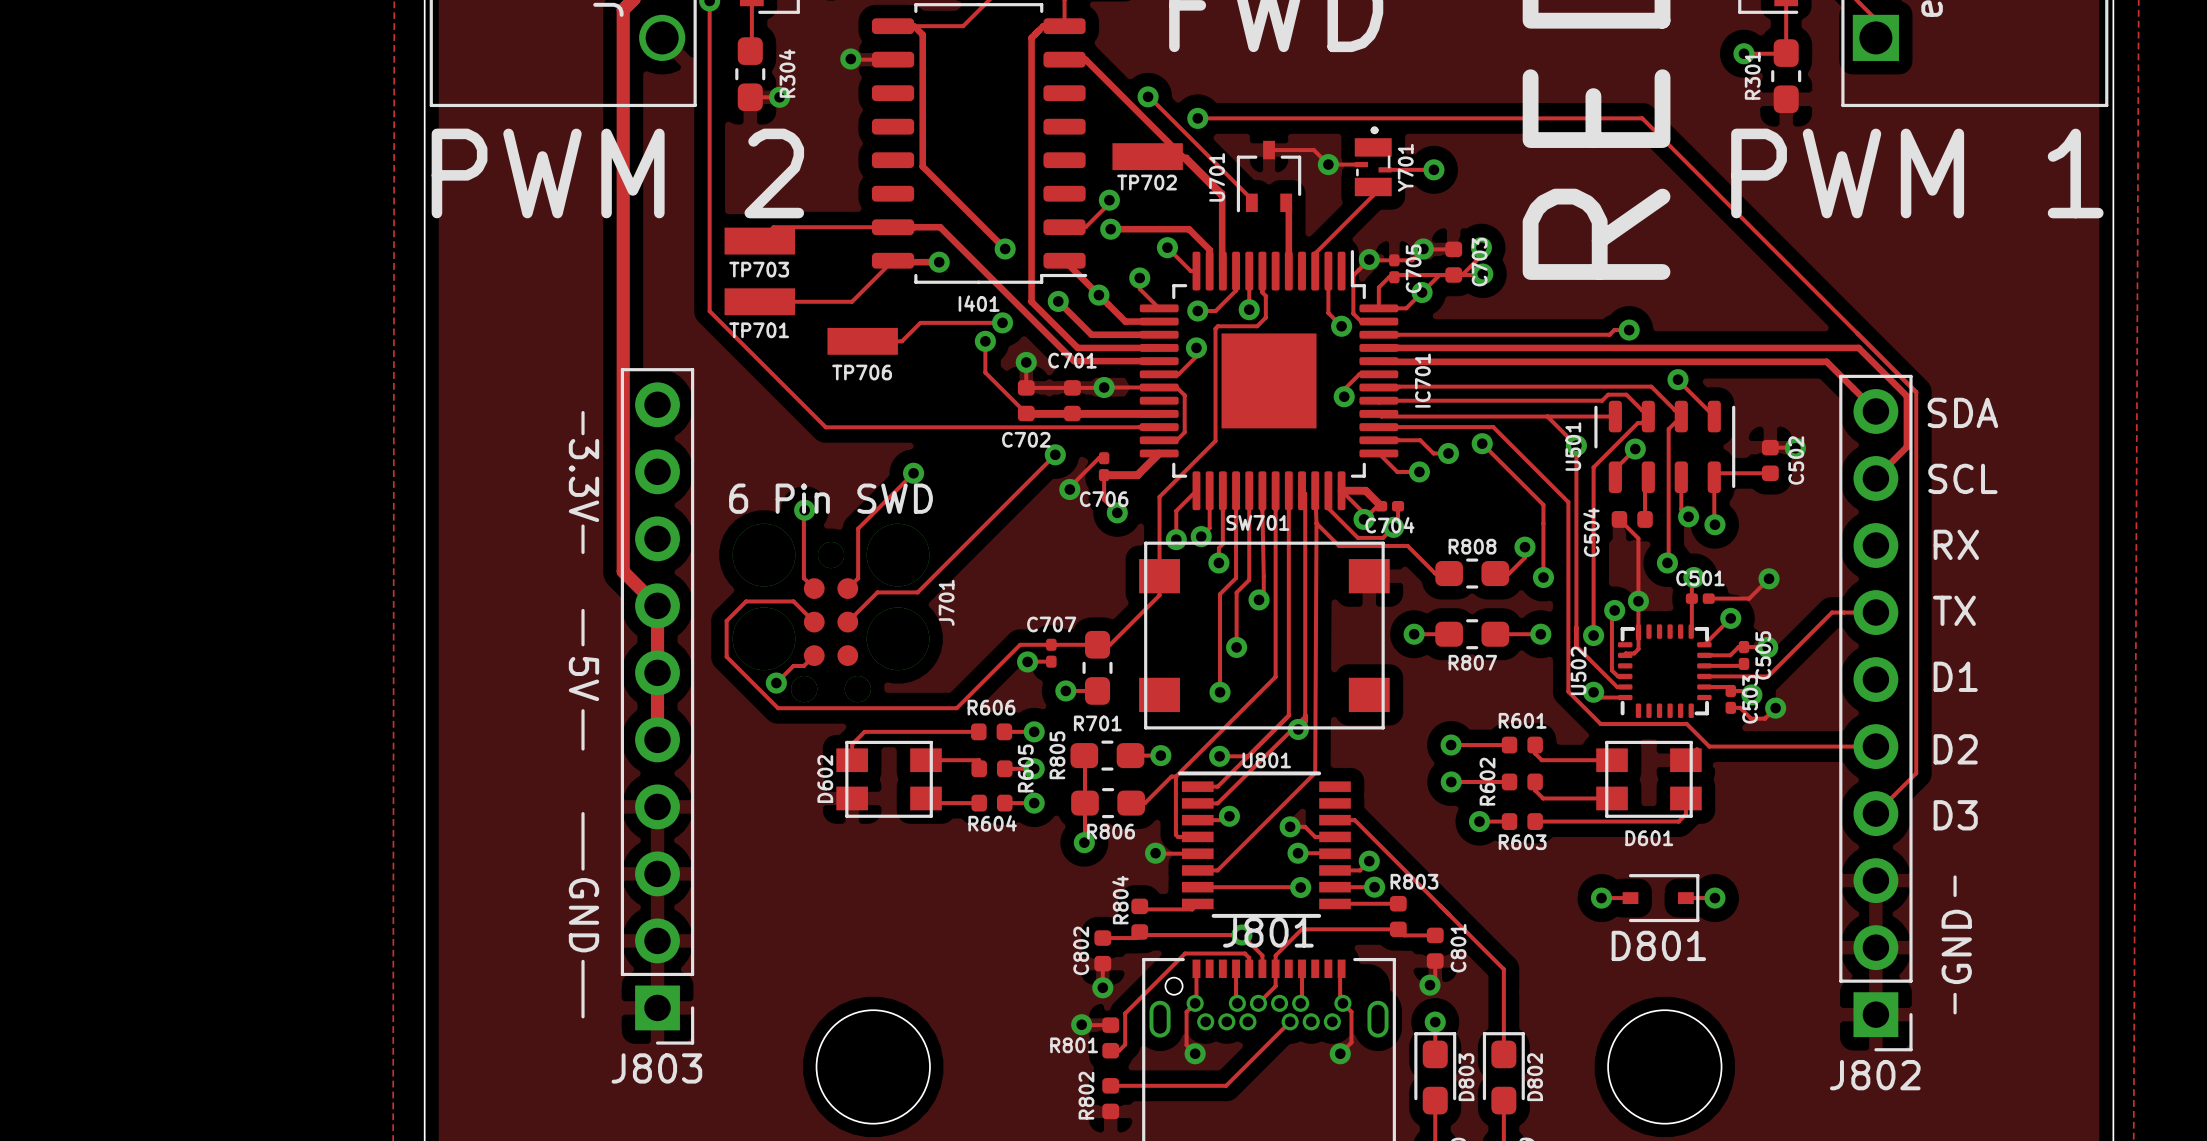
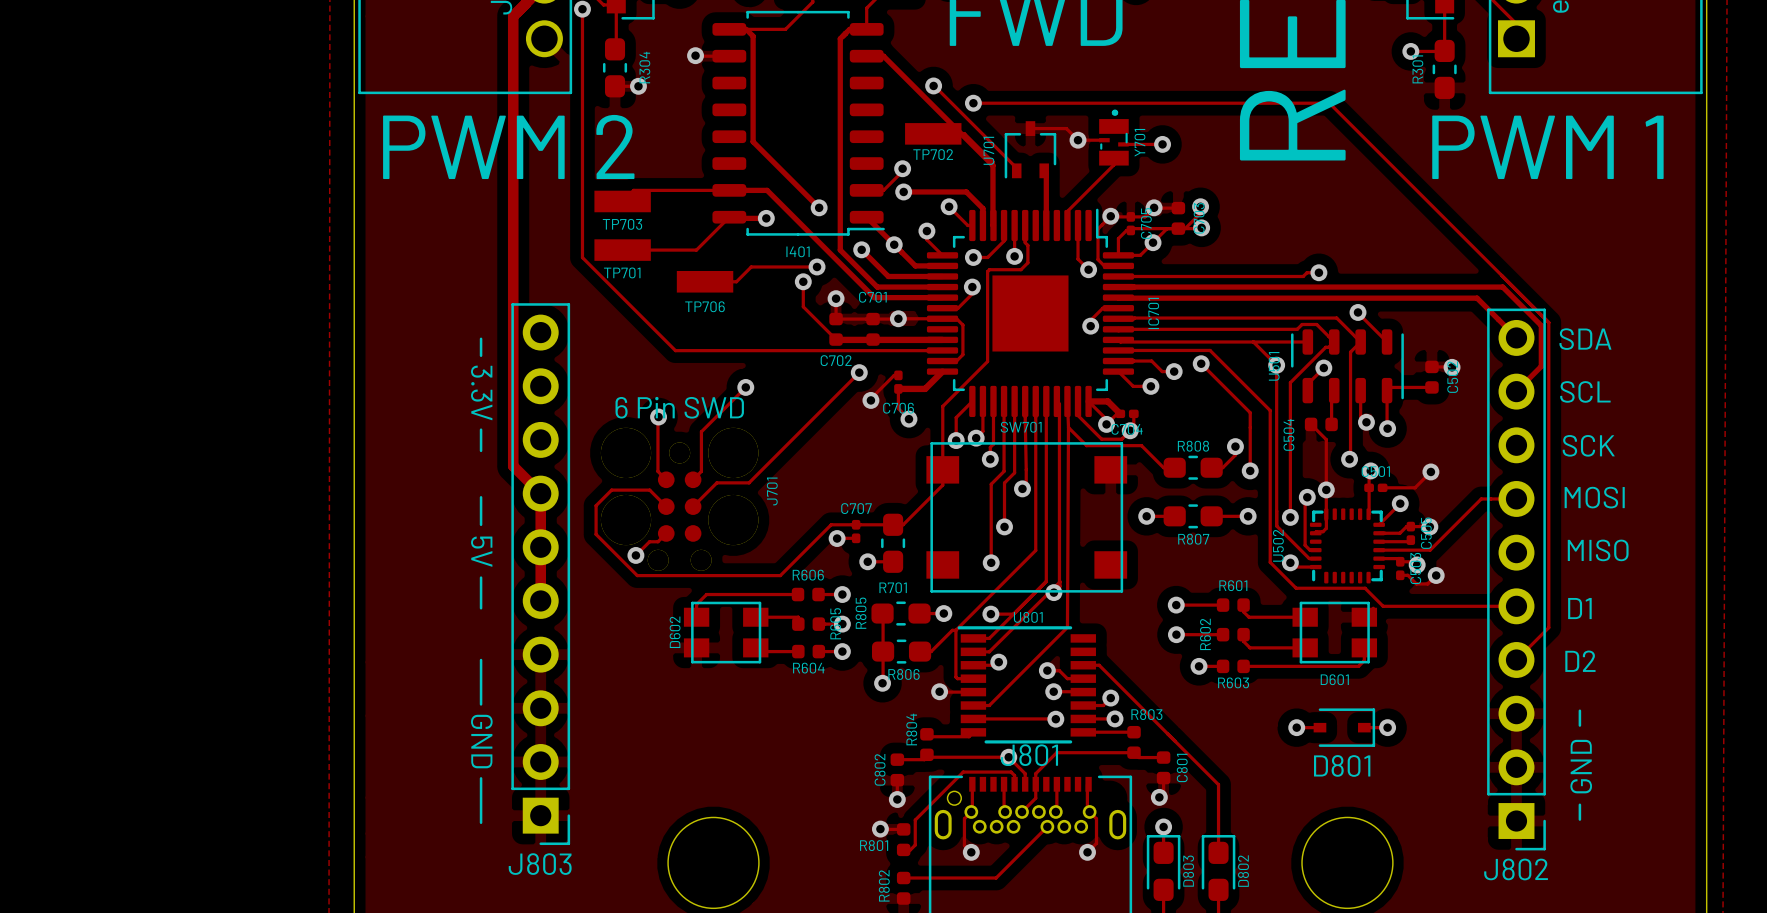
text: RX (1956, 544) -> SCK (1588, 445)
text: TX (1954, 610) -> MOSI (1594, 497)
text: D1 (1955, 676) -> MISO (1598, 550)
text: D2 (1955, 749) -> D1 (1579, 608)
text: D3 (1955, 815) -> D2 (1580, 661)

